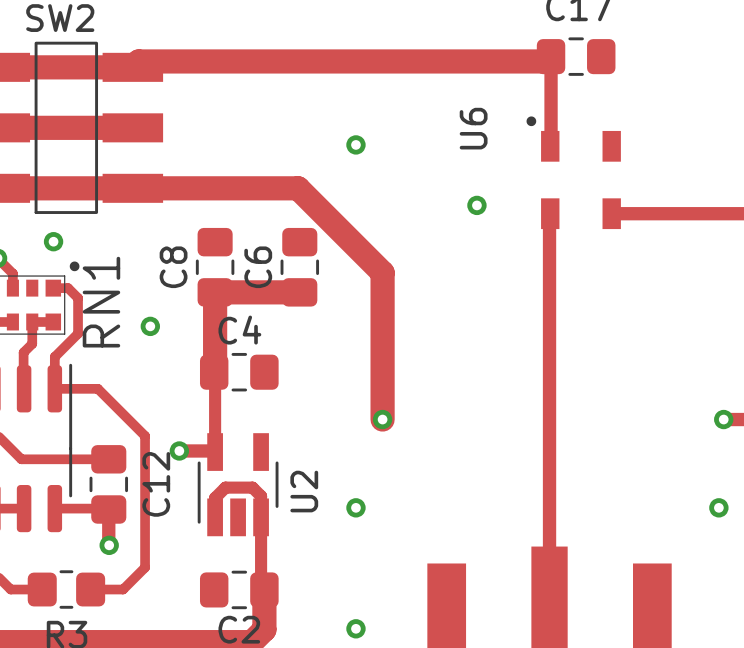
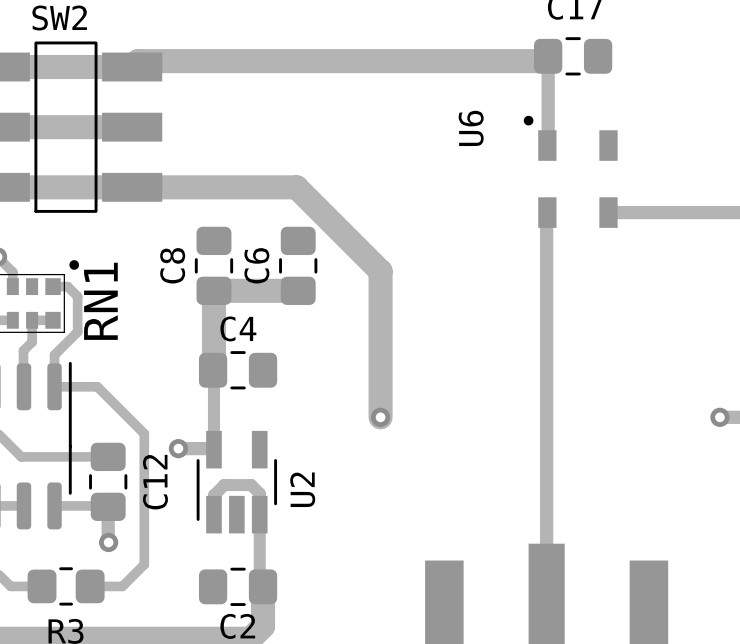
via: (355, 144) -> none
via: (476, 205) -> none
via: (53, 241) -> none
via: (150, 326) -> none
via: (355, 507) -> none
via: (718, 507) -> none
via: (355, 628) -> none

